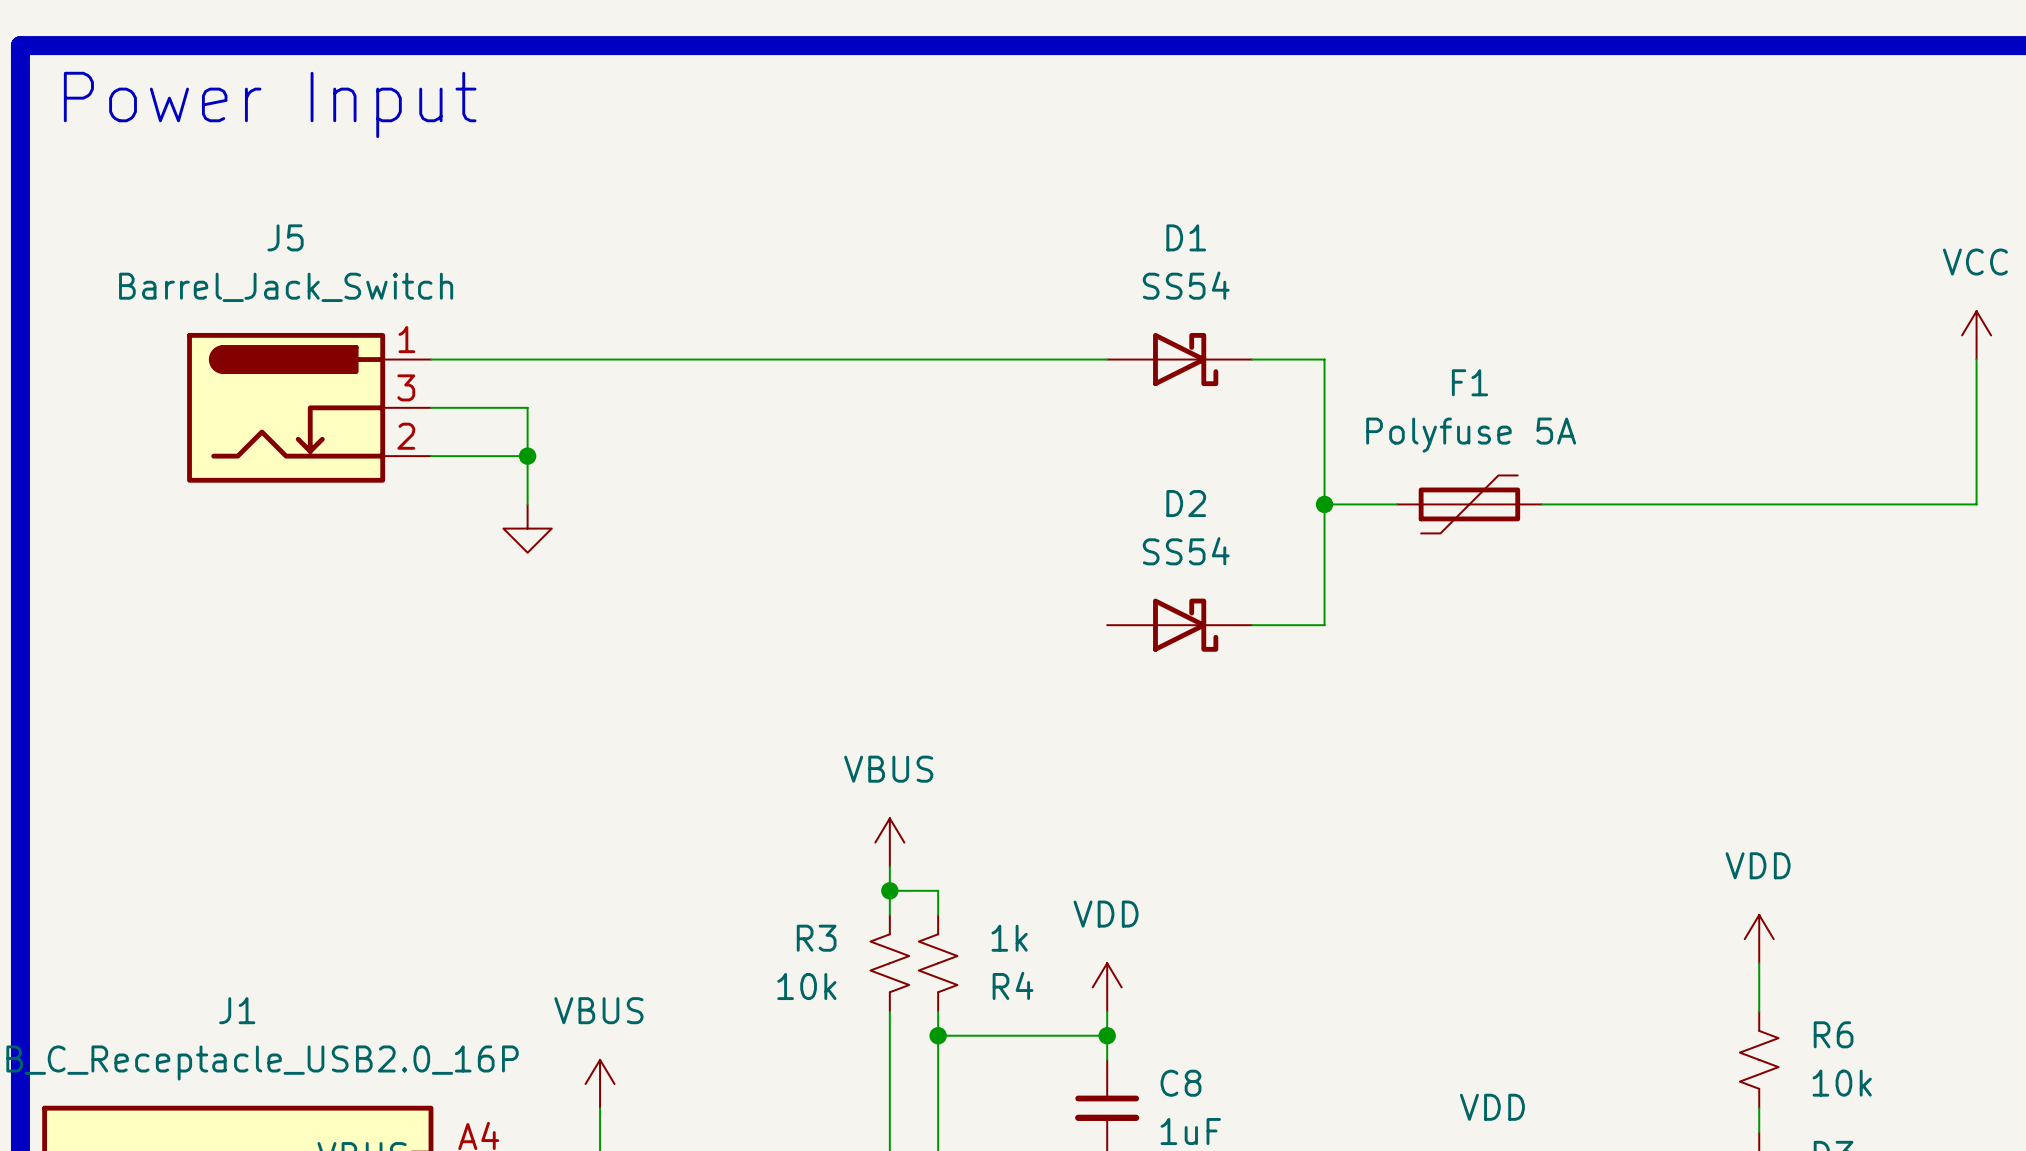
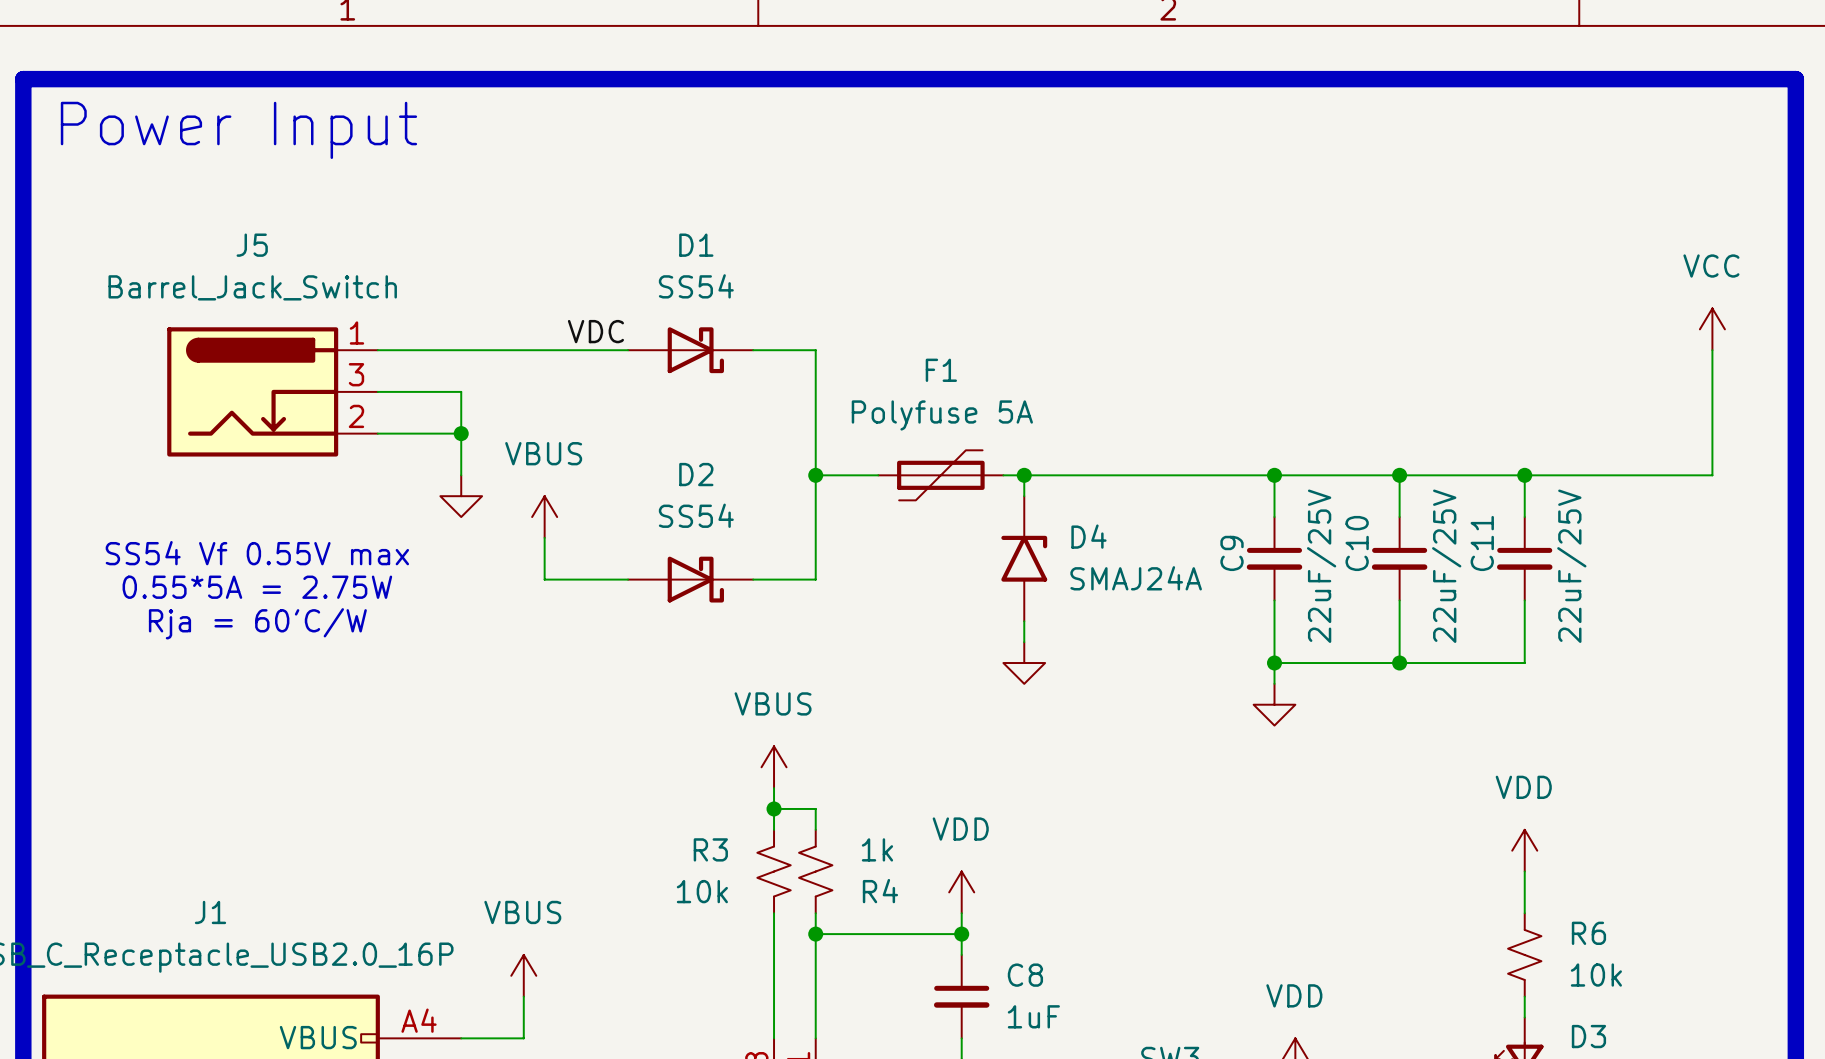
label: none -> VDC (595, 331)
wire: (938, 359) (1107, 359) -> (815, 350) (815, 579) (753, 579)
D1 position: (1179, 359) -> (690, 350)
wire: (1252, 359) (1324, 359) (1324, 625) (1252, 625) -> none
wire: none -> (815, 475) (878, 475)
junction: none -> (815, 475)
wire: none -> (1003, 475) (1149, 475)
wire: none -> (1024, 475) (1024, 496)
junction: none -> (1024, 475)
junction: (1324, 504) -> none
wire: none -> (1274, 475) (1274, 517)
junction: none -> (1274, 475)
F1 position: (1469, 504) -> (940, 475)
wire: none -> (1399, 475) (1399, 517)
junction: none -> (1399, 475)
wire: none -> (1524, 475) (1524, 517)
junction: none -> (1524, 475)
power symbol: none -> VBUS (544, 517)
wire: none -> (544, 537) (544, 579) (628, 579)
text: none -> SS54 Vf 0.55V max (257, 553)
D4: none -> SMAJ24A (1024, 558)
C9: none -> 22uF/25V (1274, 558)
C10: none -> 22uF/25V (1399, 558)
C11: none -> 22uF/25V (1524, 558)
D2 position: (1179, 625) -> (690, 579)
text: none -> 0.55*5A = 2.75W (257, 587)
wire: none -> (1274, 600) (1274, 683)
wire: none -> (1399, 600) (1399, 663)
wire: none -> (1524, 600) (1524, 663) (1274, 663)
wire: none -> (1024, 621) (1024, 642)
text: none -> Rja = 60'C/W (257, 623)
power symbol: none -> (1024, 663)
junction: none -> (1274, 663)
junction: none -> (1399, 663)
power symbol: none -> (1274, 704)

